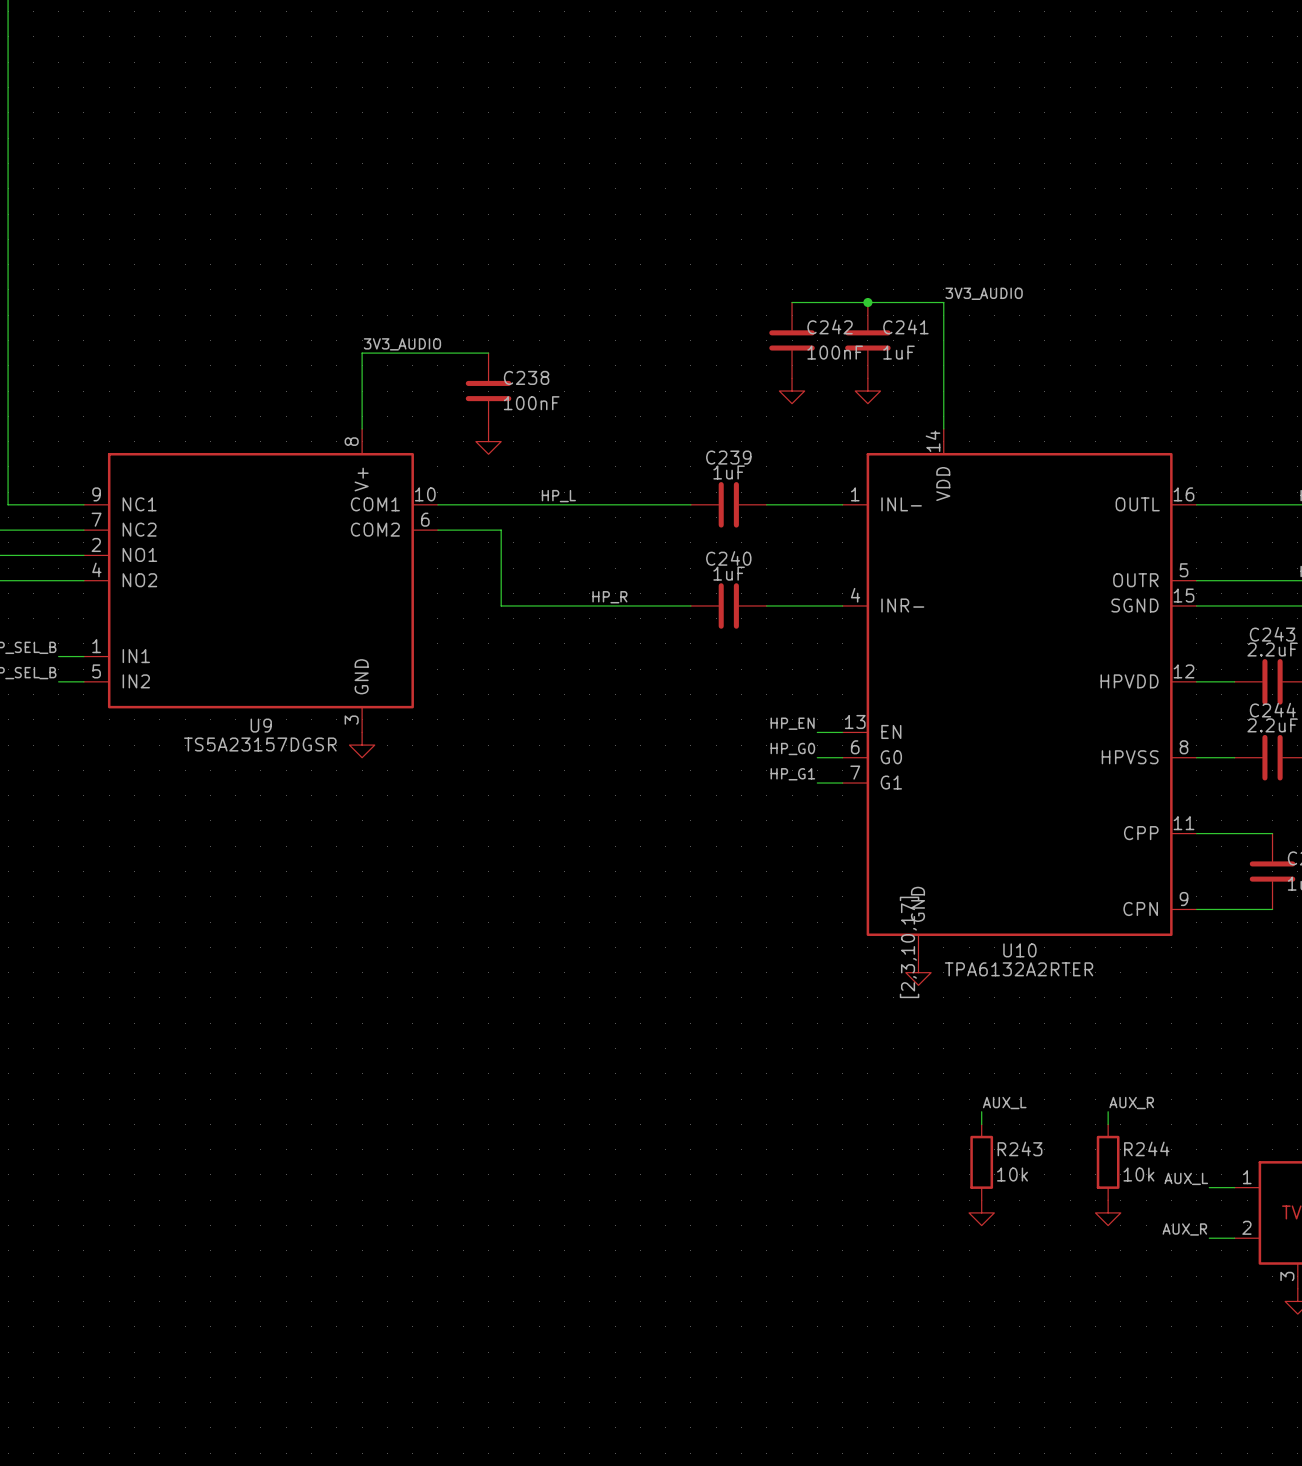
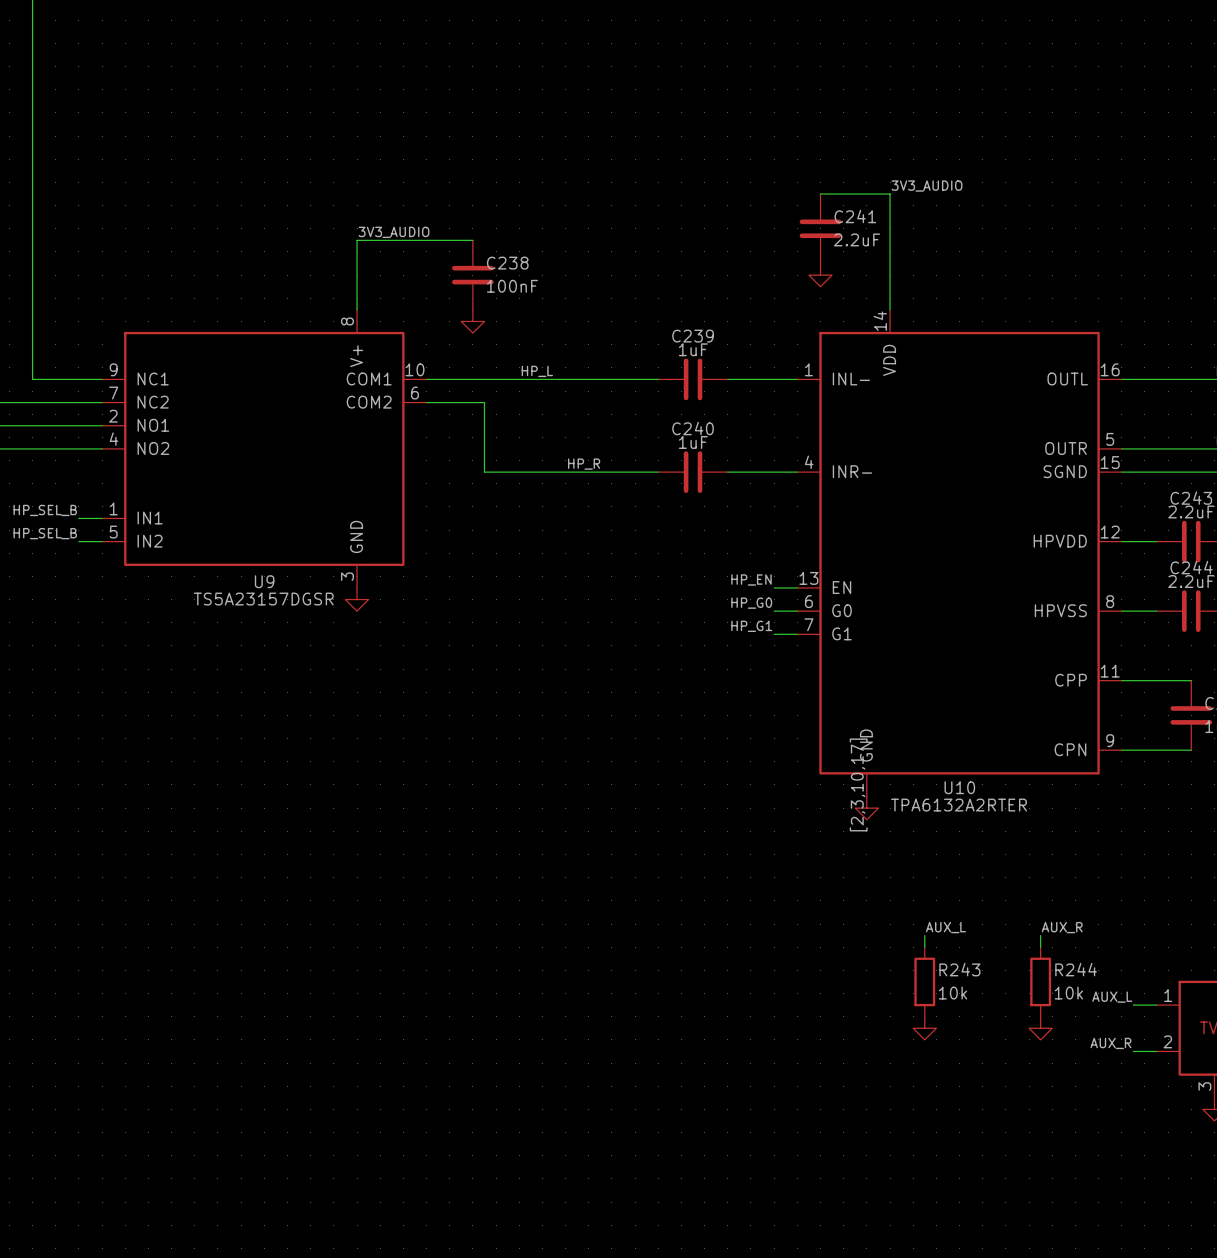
wire: (792, 302) (867, 302) -> none
junction: (867, 302) -> none
C242: 100nF (792, 340) -> none
C241 value: 1uF (898, 352) -> 2.2uF (857, 239)
power symbol: (792, 391) -> none

